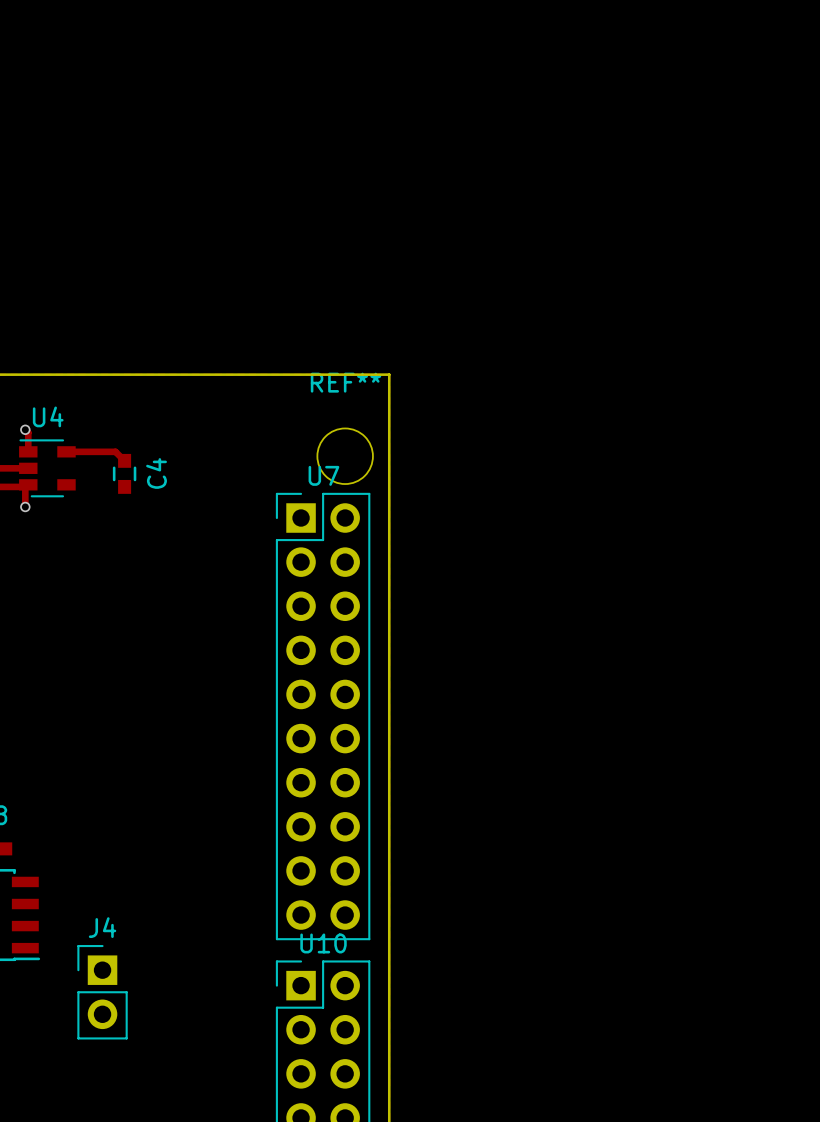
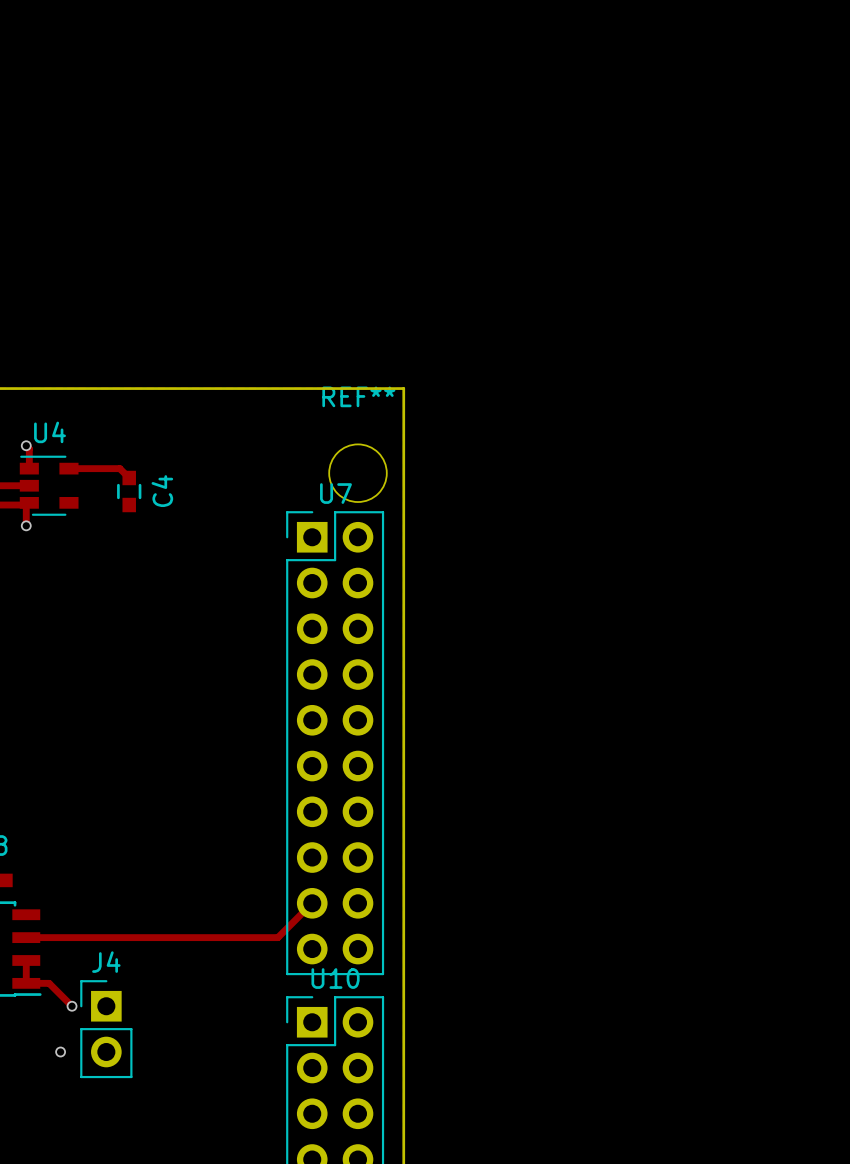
track: none -> (312, 903) (277, 937) (26, 937)
track: none -> (26, 960) (26, 983) (49, 983) (72, 1006)
via: none -> (72, 1006)
via: none -> (60, 1052)

